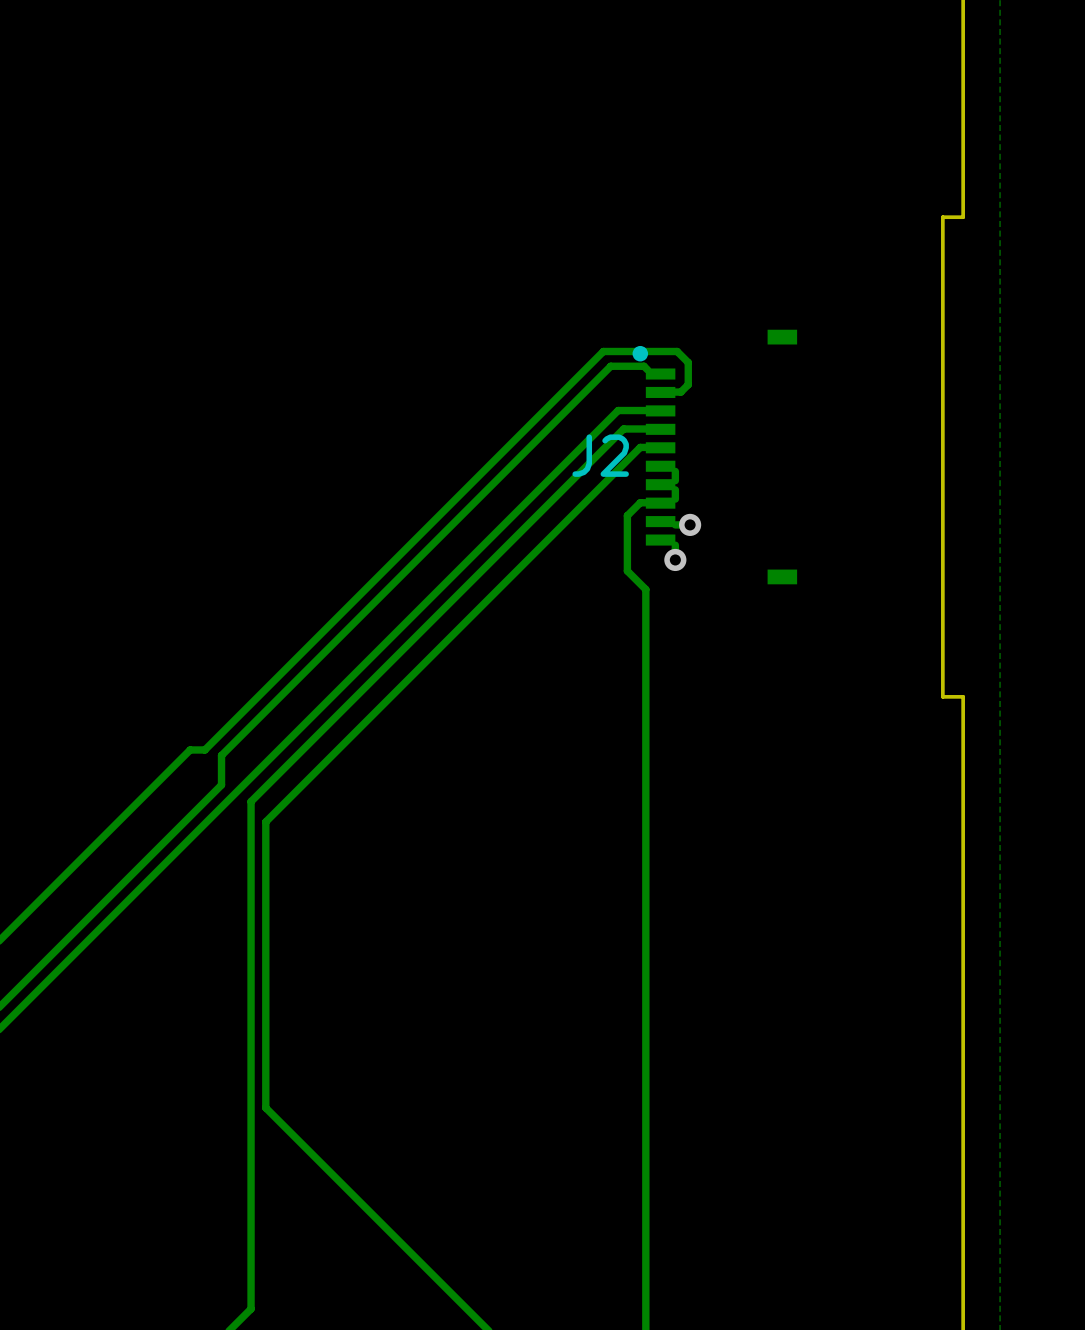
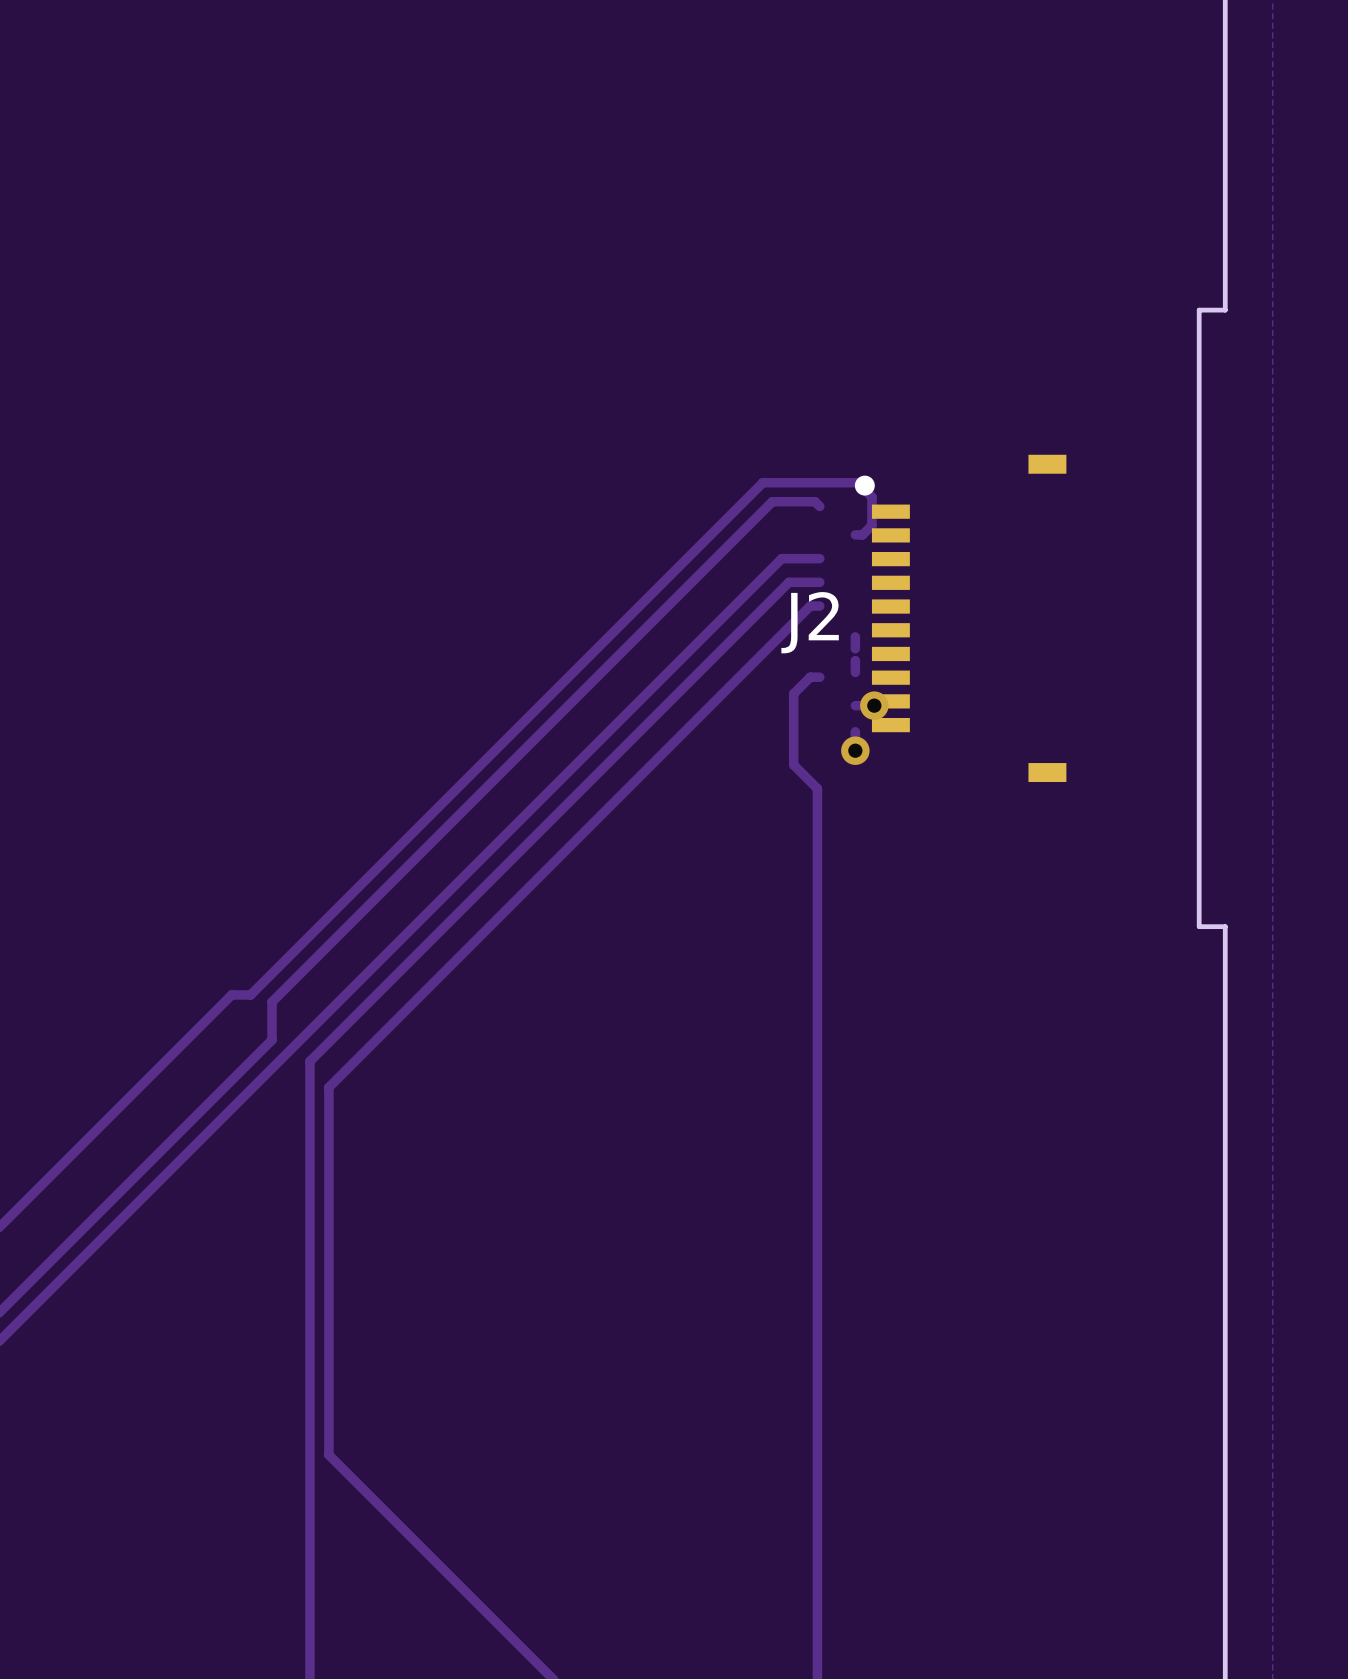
J2 position: (714, 457) -> (960, 618)

